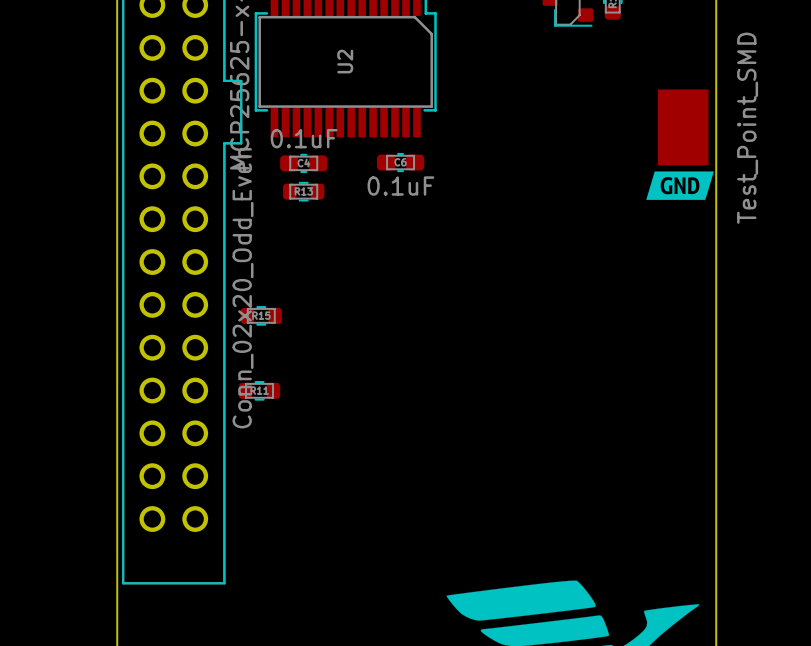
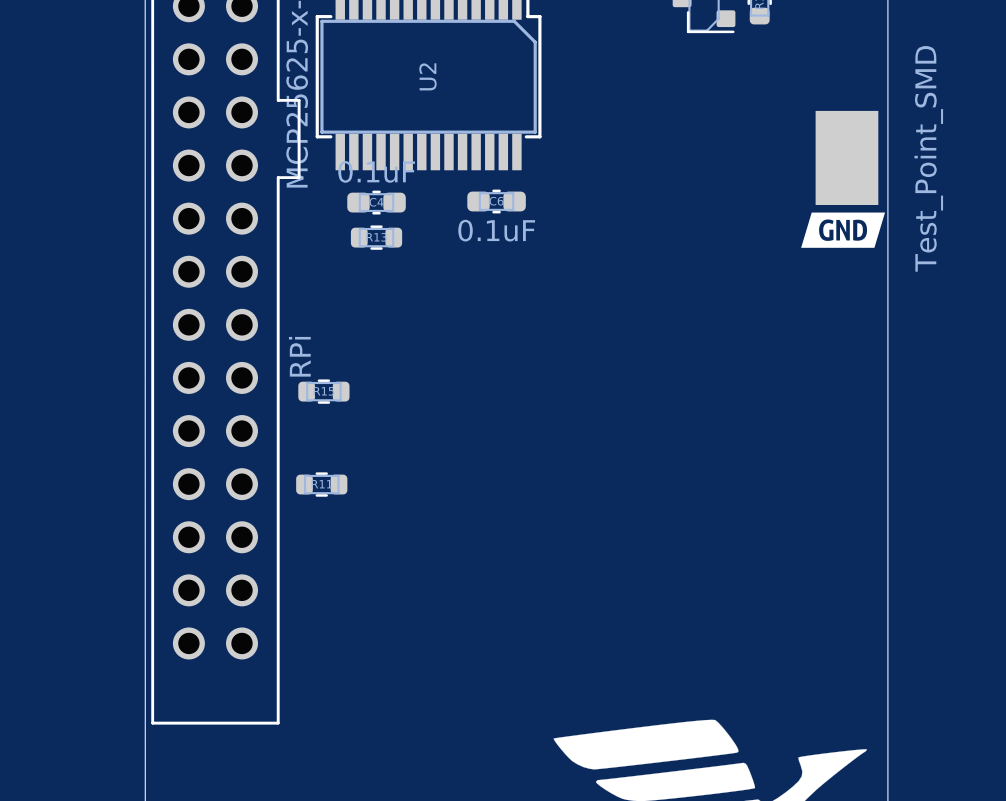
part value: Conn_02x20_Odd_Even (243, 288) -> RPi (299, 356)

